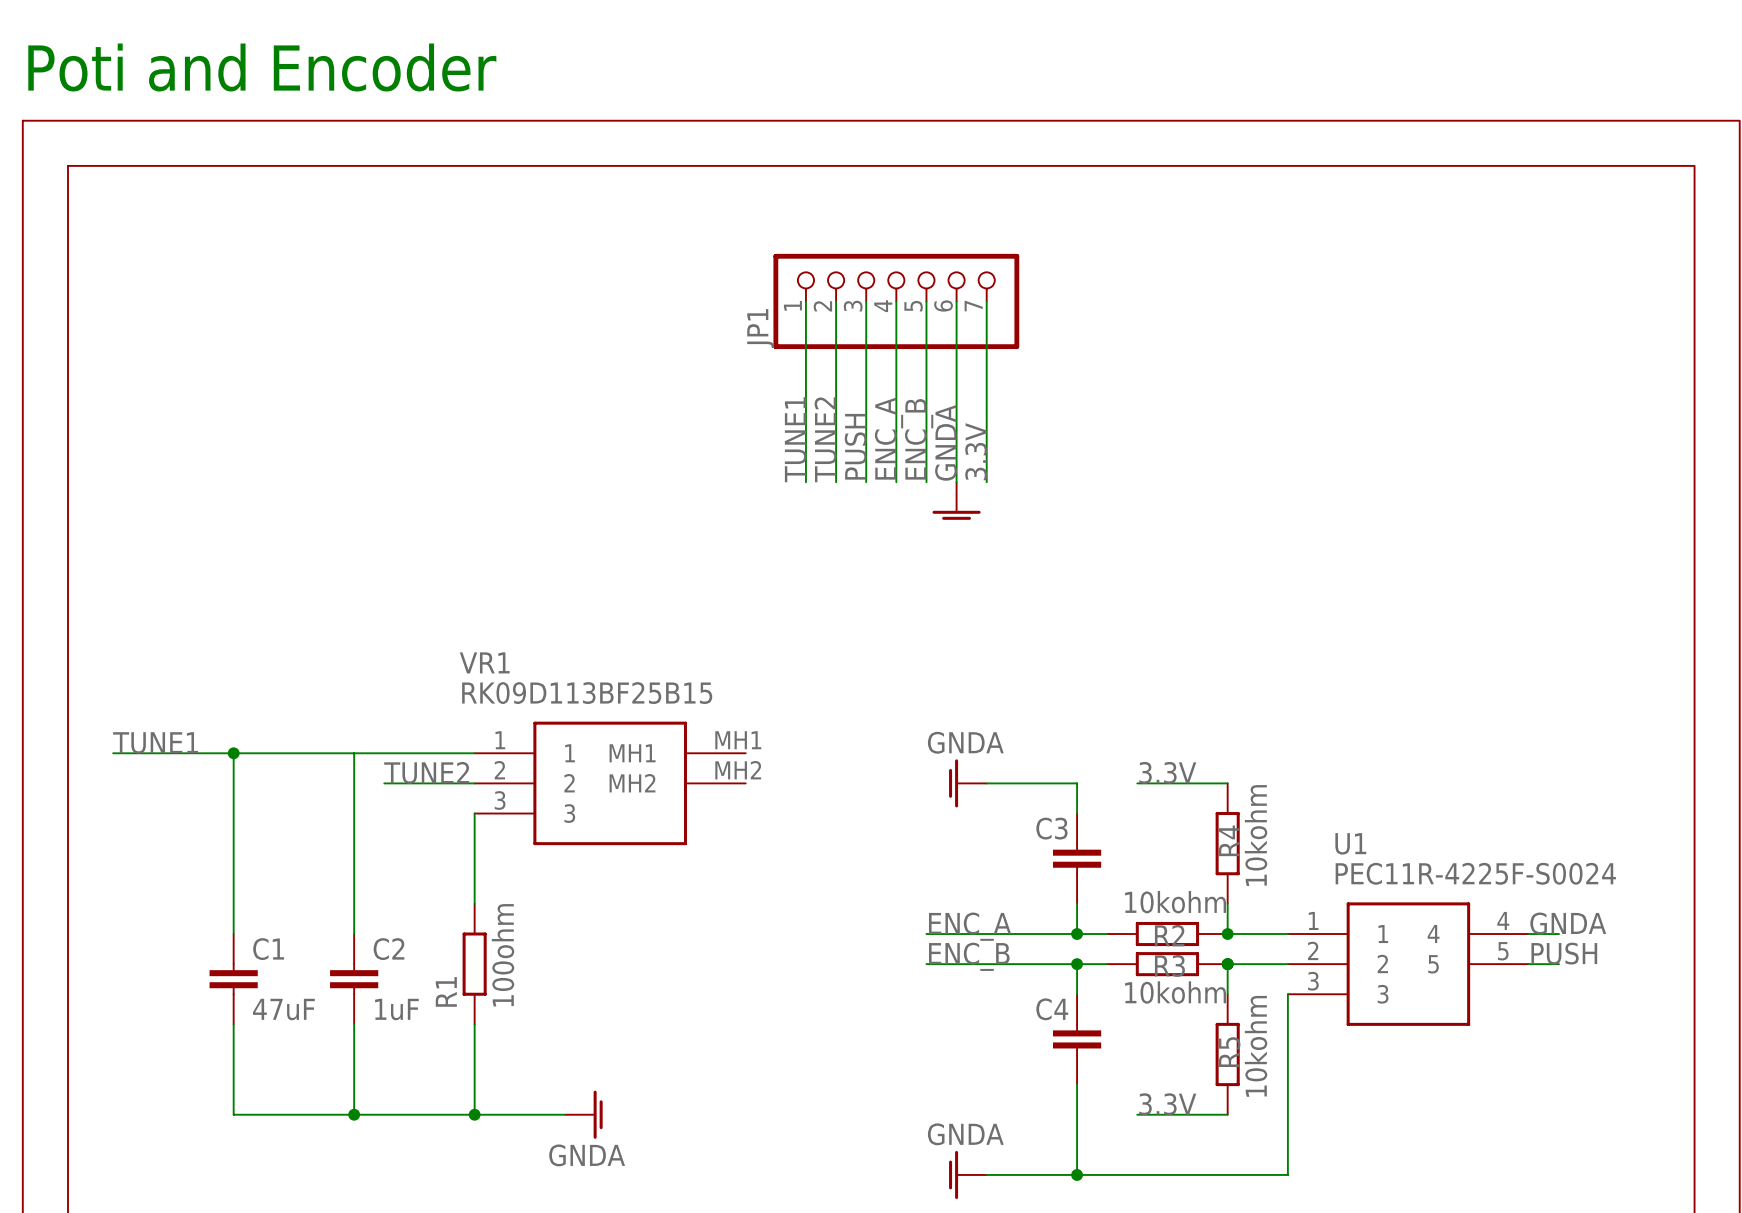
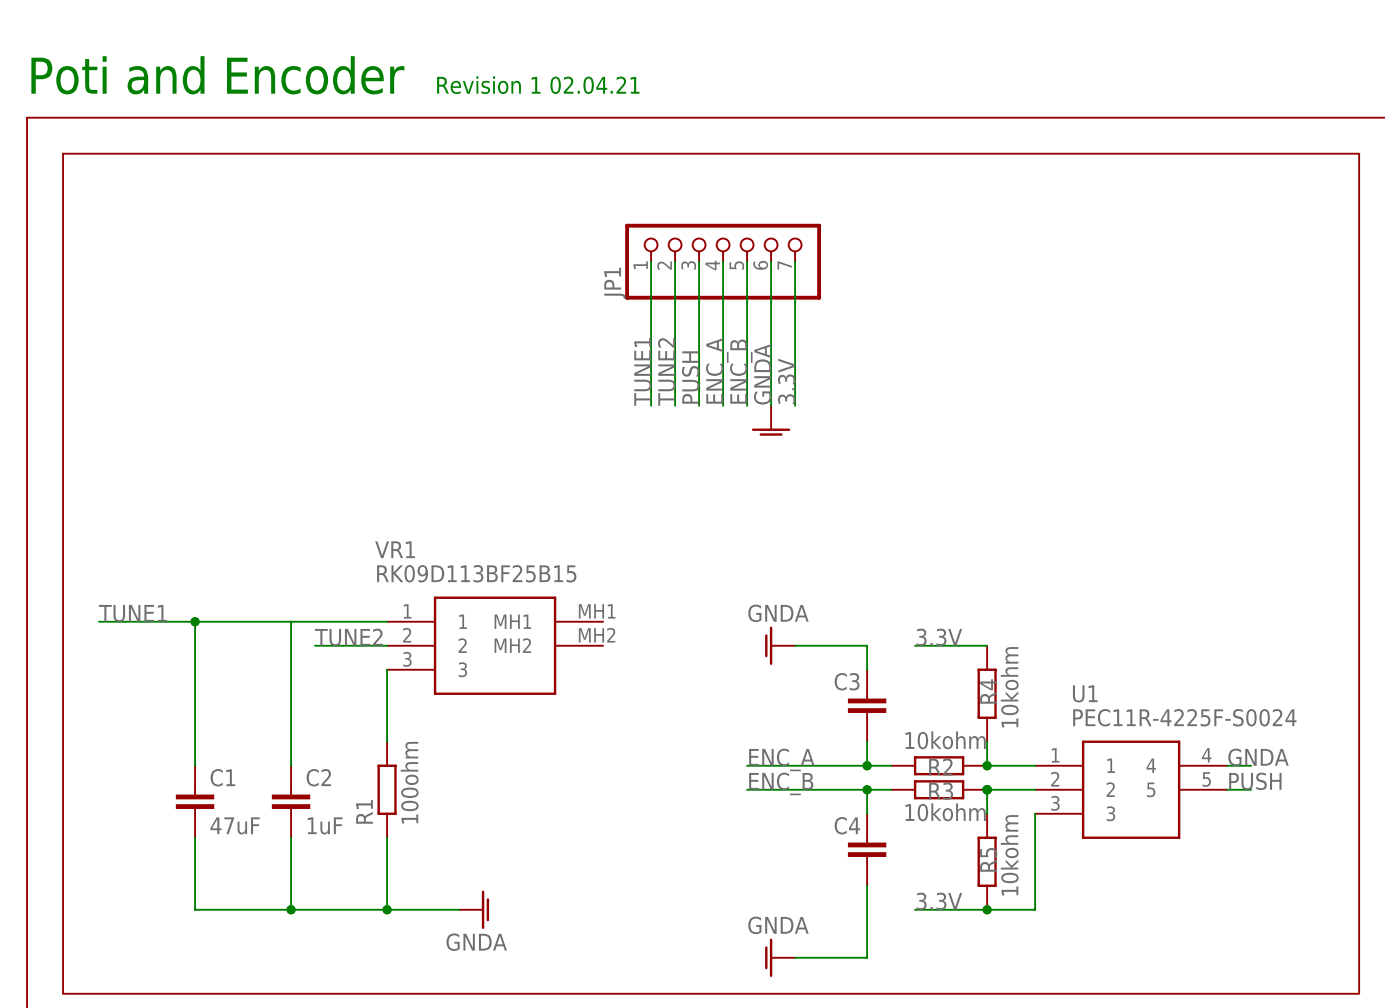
text: none -> Revision 1 02.04.21 (538, 85)
junction: none -> (987, 909)
wire: (1287, 1114) (1287, 1174) (1077, 1174) -> (1035, 909) (987, 909)
junction: (1077, 1174) -> none

